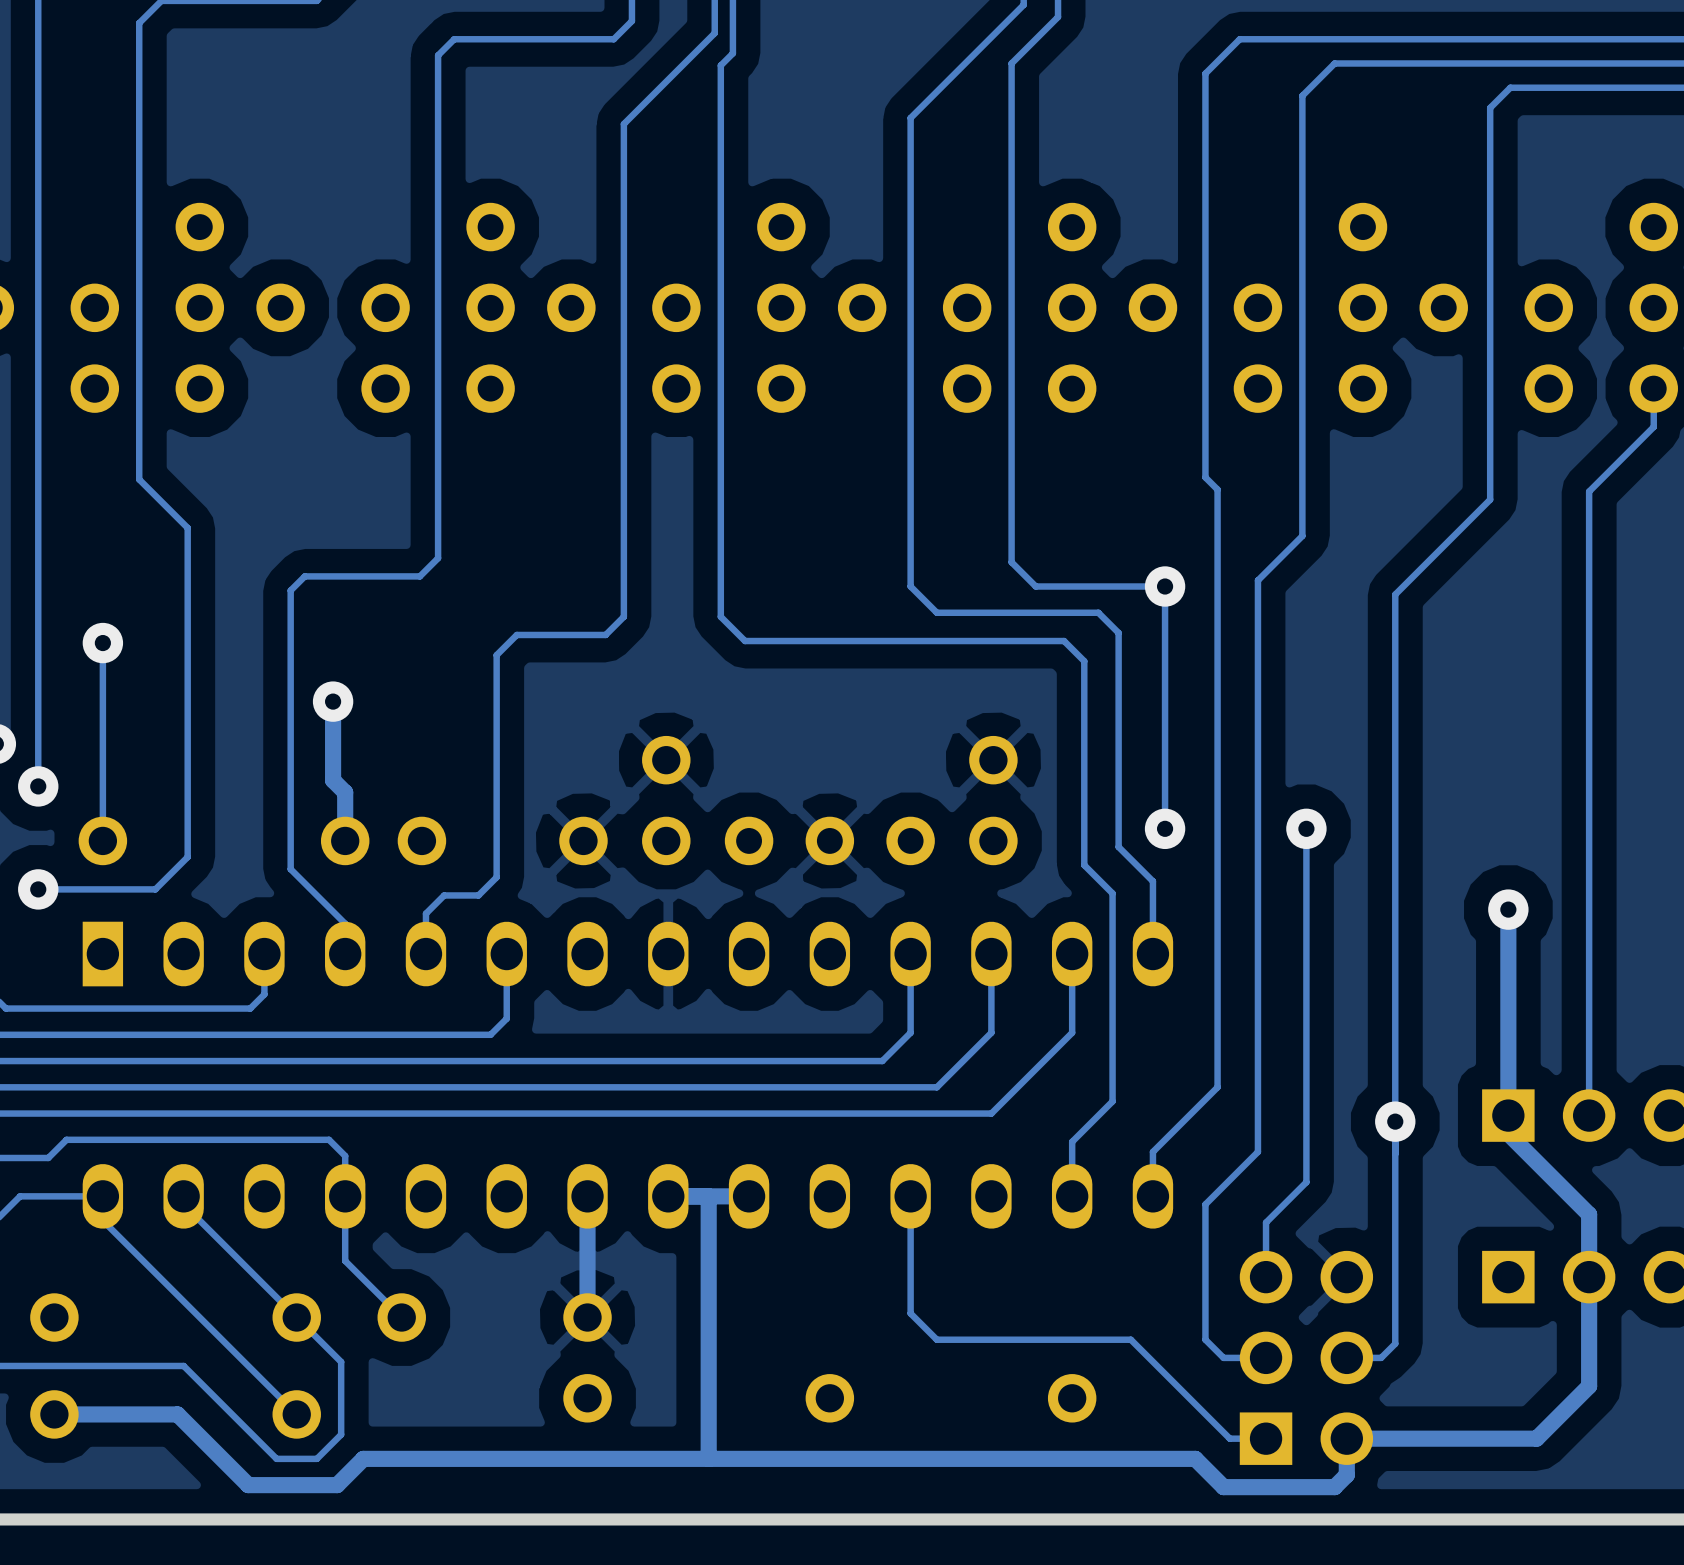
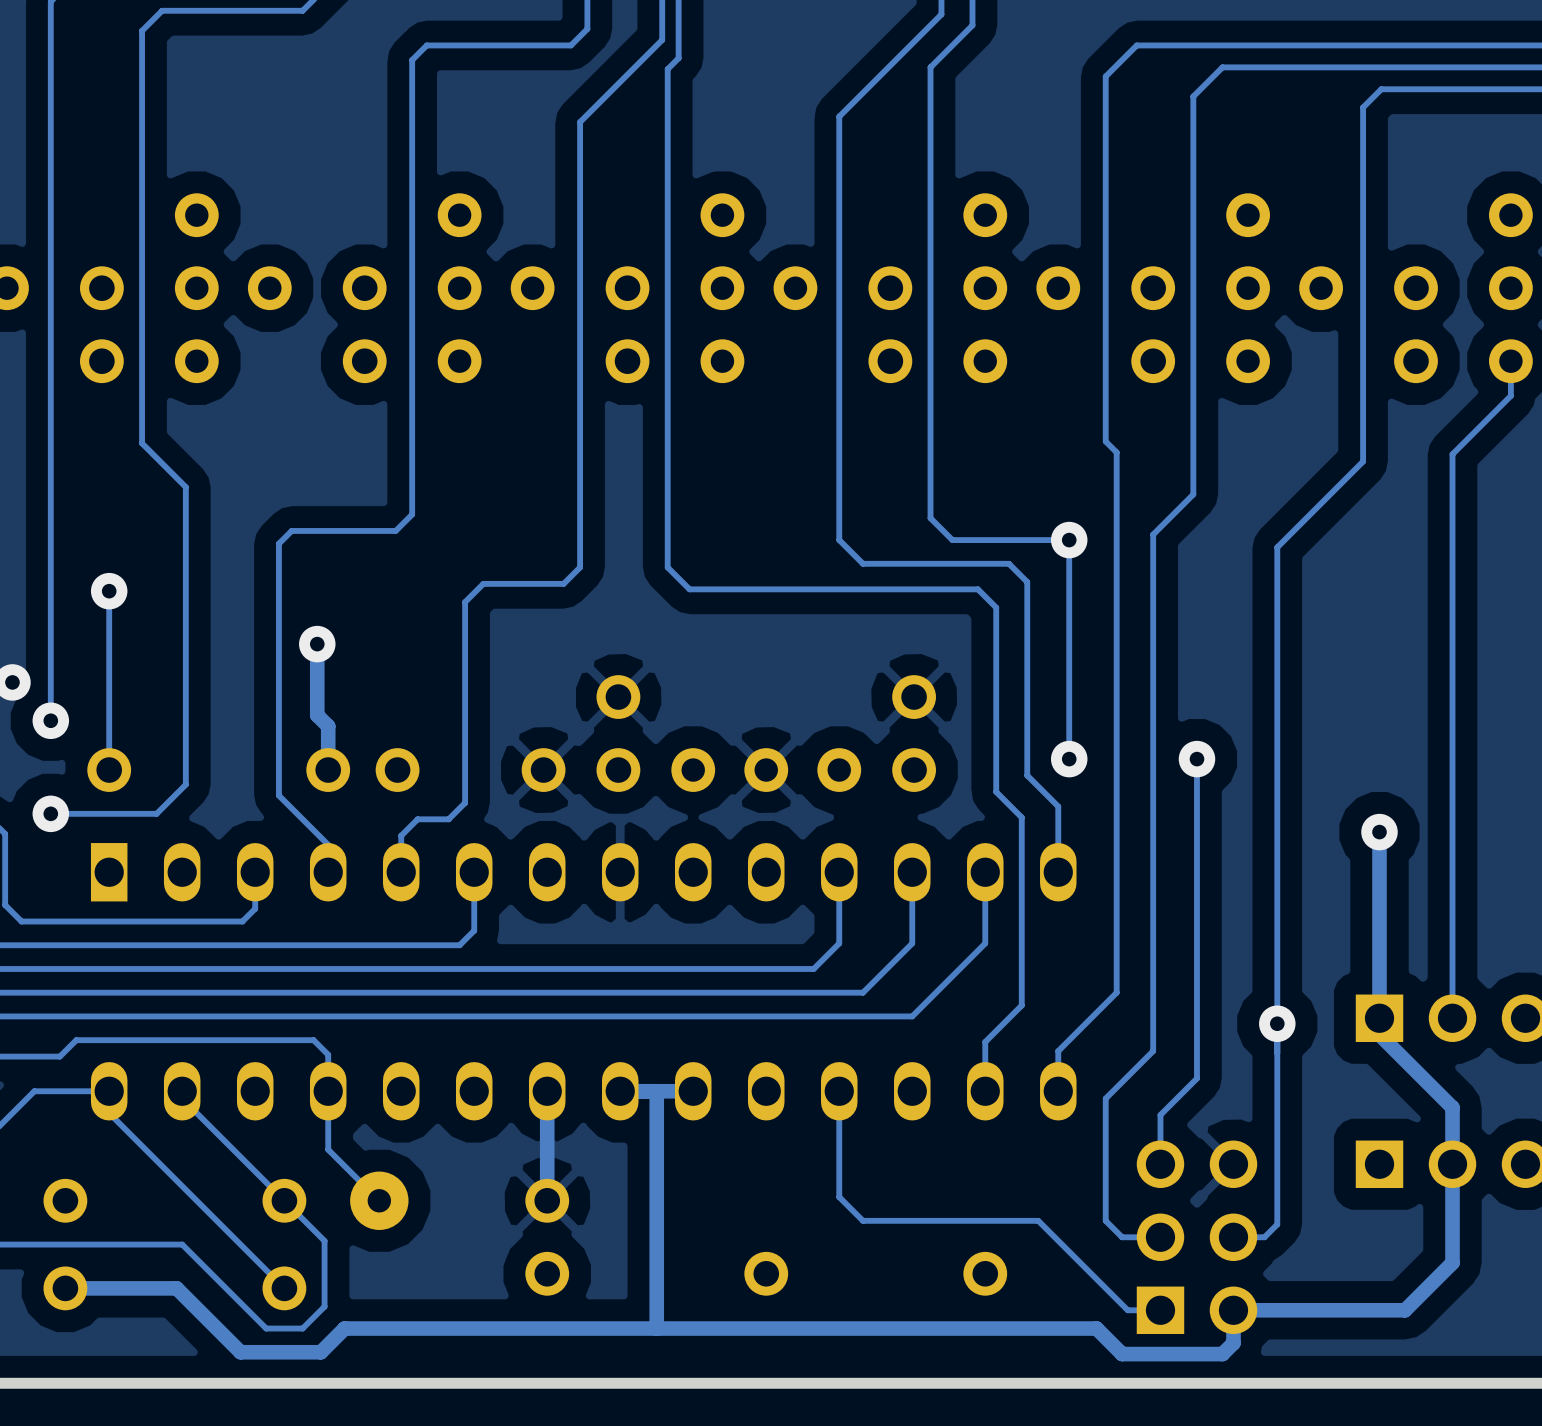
part footprint: [377, 1293, 426, 1342] -> [350, 1171, 409, 1230]

